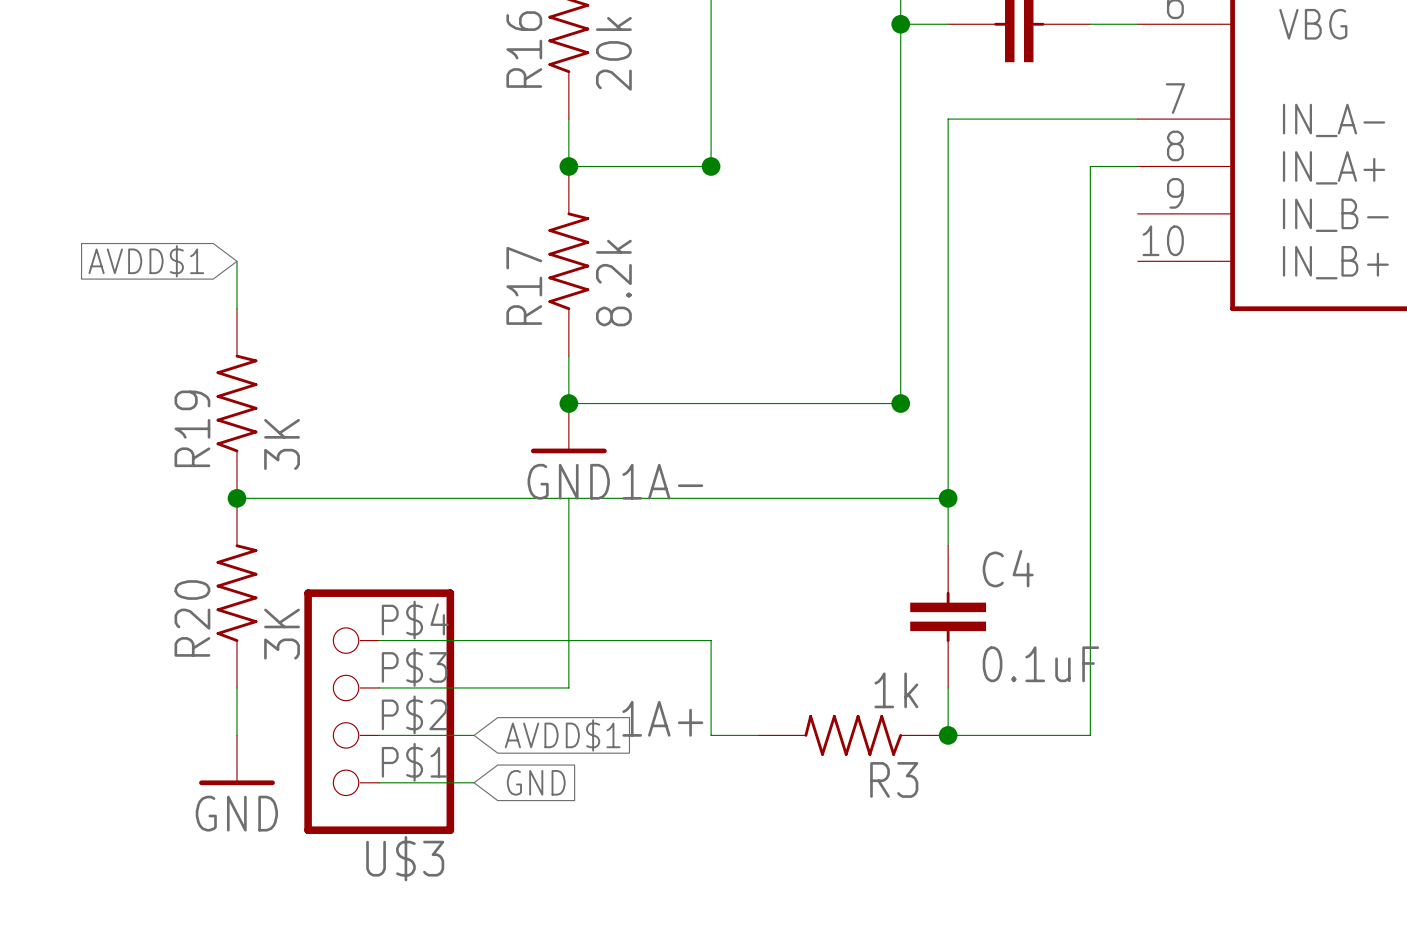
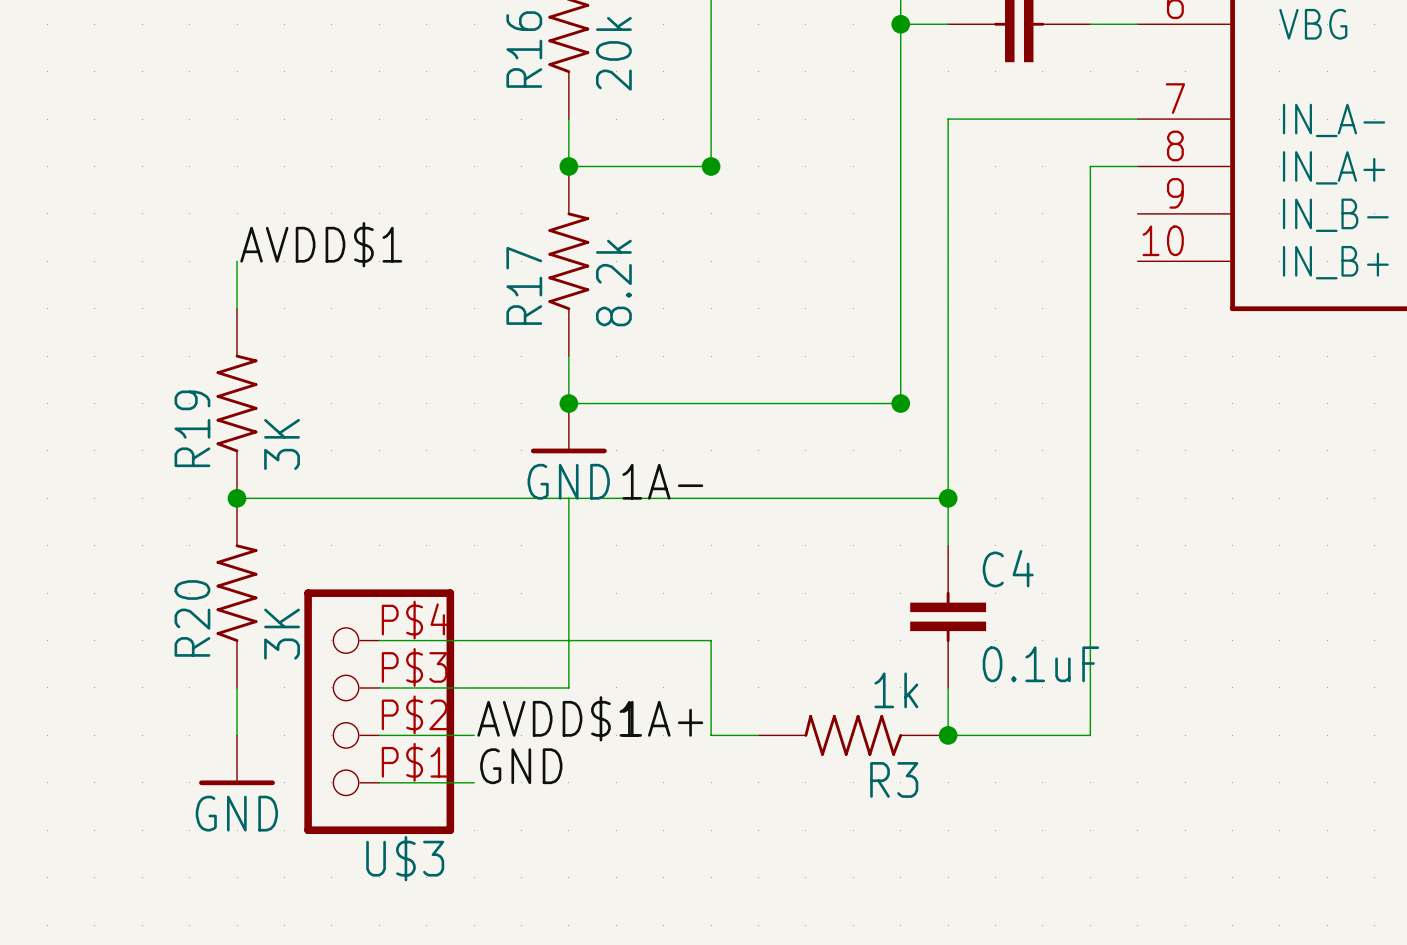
label: none -> AVDD$1 (321, 244)
global label: AVDD$1 (146, 261) -> none
label: none -> AVDD$1 (558, 718)
global label: AVDD$1 (562, 735) -> none
label: none -> GND (521, 766)
global label: GND (536, 782) -> none

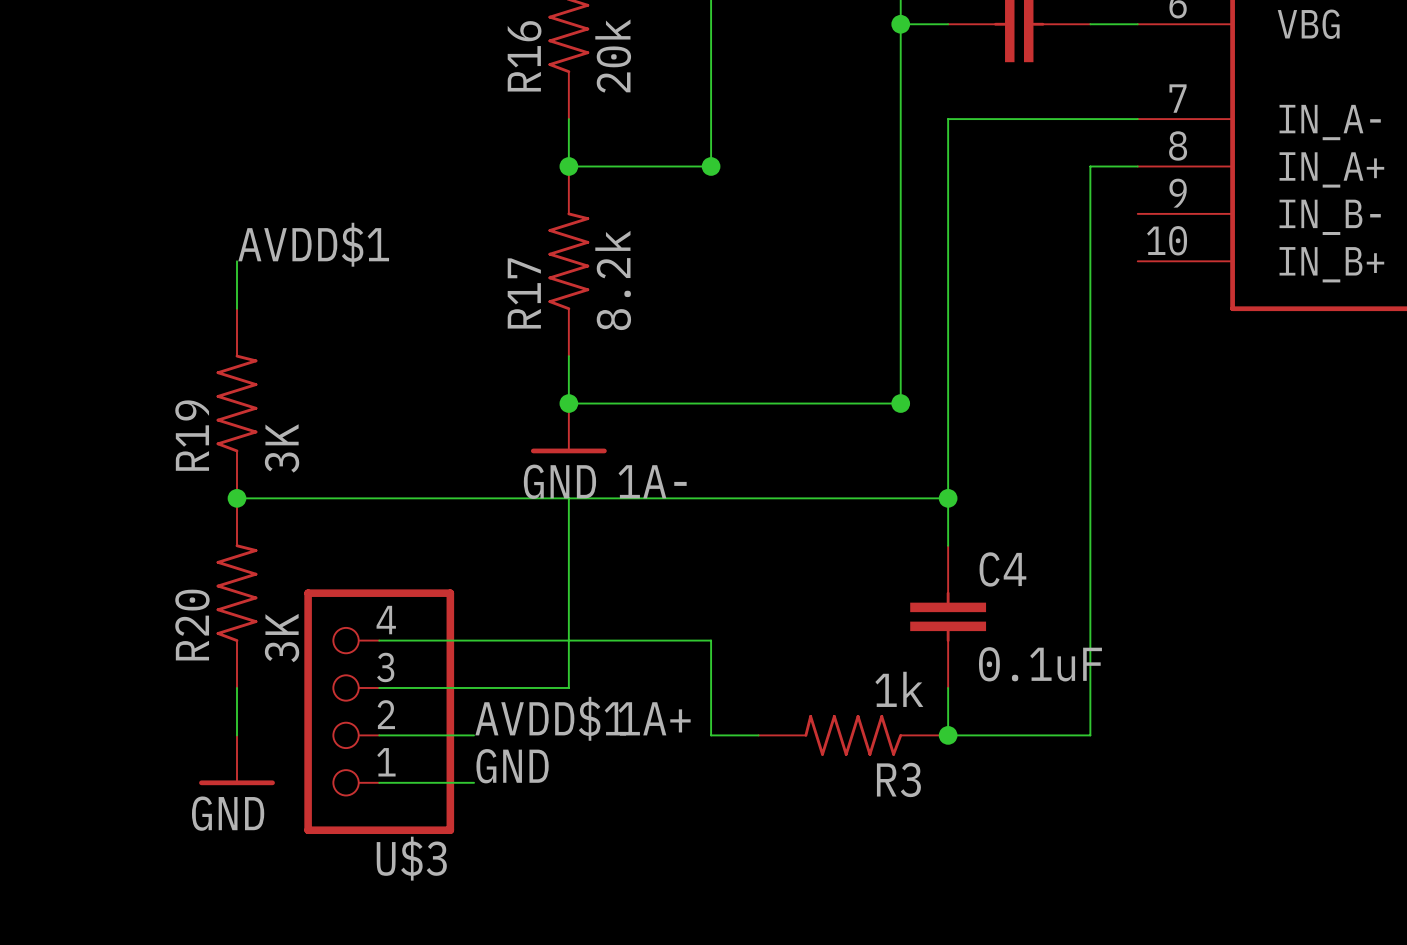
U$3 pin number: P$4 (415, 620) -> 4 (386, 620)
U$3 pin number: P$3 (414, 667) -> 3 (385, 667)
U$3 pin number: P$2 (414, 714) -> 2 (386, 714)
U$3 pin number: P$1 (414, 762) -> 1 (386, 762)

